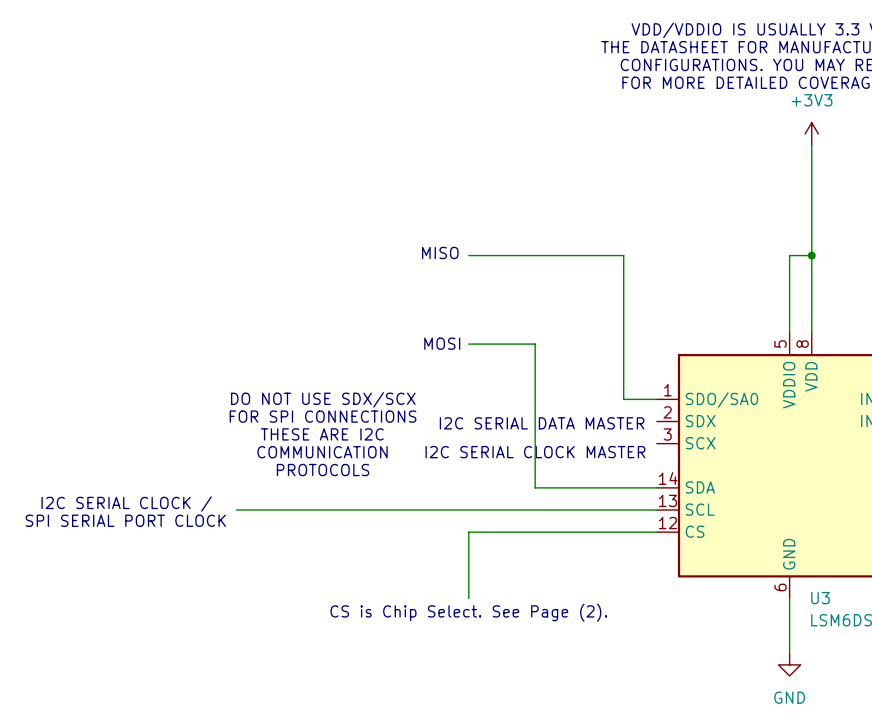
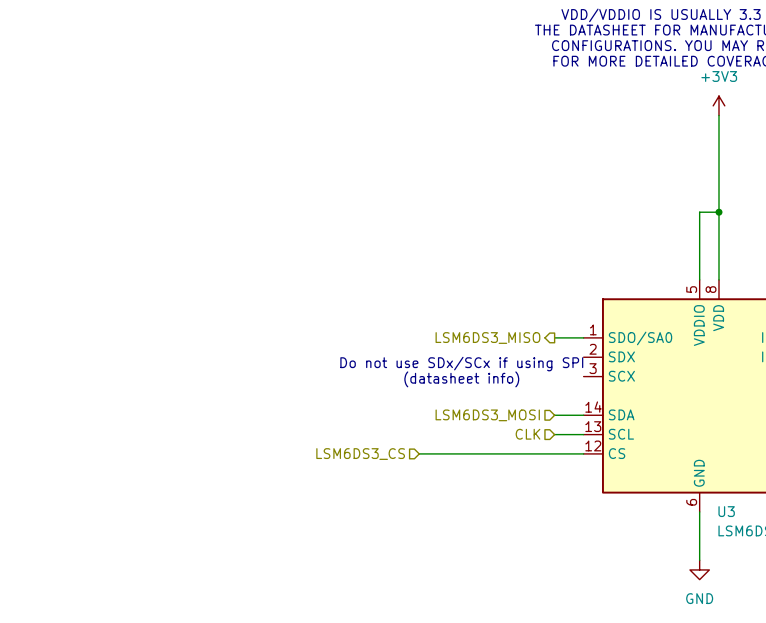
text: MISO (440, 252) -> none
wire: (468, 255) (623, 255) (623, 399) -> none
text: MOSI (442, 343) -> none
wire: (468, 344) (535, 344) (535, 487) (623, 487) -> none
text: DO NOT USE SDX/SCX (323, 399) -> none
hierarchical label: none -> LSM6DS3_MISO (487, 338)
text: FOR SPI CONNECTIONS (323, 416) -> none
text: I2C SERIAL DATA MASTER (542, 423) -> none
text: none -> Do not use SDx/SCx if using SPI (461, 364)
text: THESE ARE I2C (322, 434) -> none
text: none -> (datasheet info) (461, 379)
text: COMMUNICATION (322, 452) -> none
text: I2C SERIAL CLOCK MASTER (535, 452) -> none
text: PROTOCOLS (323, 470) -> none
hierarchical label: none -> LSM6DS3_MOSI (487, 415)
text: I2C SERIAL CLOCK / (126, 504) -> none
hierarchical label: none -> CLK (528, 434)
wire: (236, 510) (623, 510) -> none
text: SPI SERIAL PORT CLOCK (125, 520) -> none
hierarchical label: none -> LSM6DS3_CS (360, 454)
wire: (468, 532) (468, 598) -> none
text: CS is Chip Select. See Page (2). (468, 612) -> none

